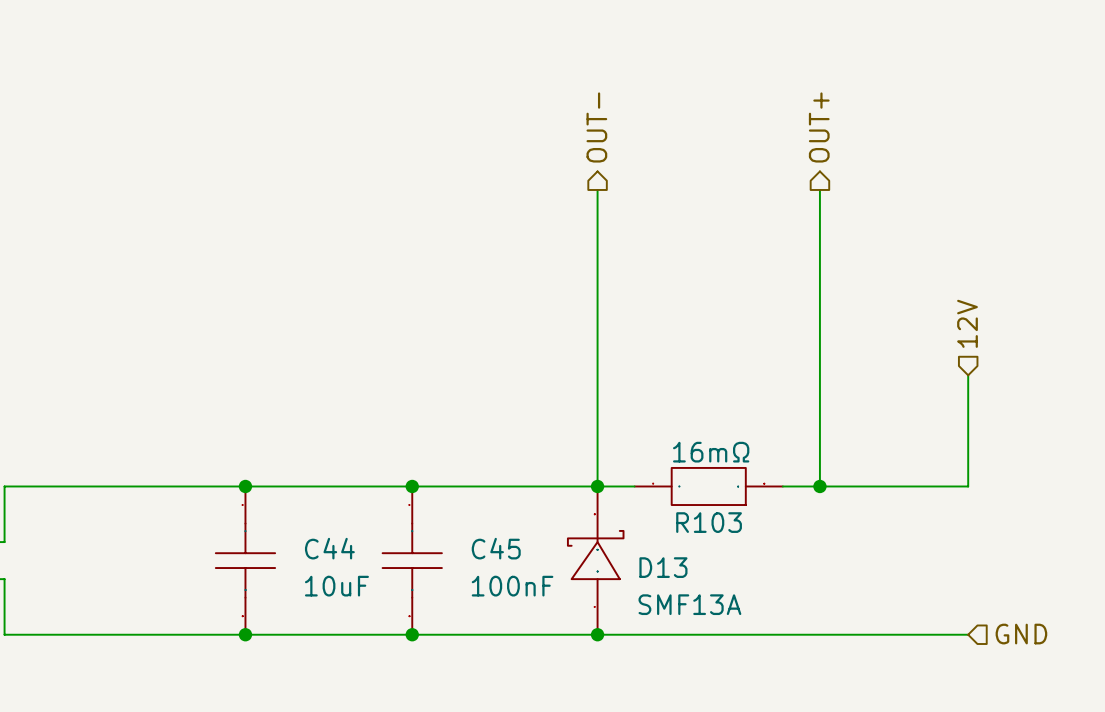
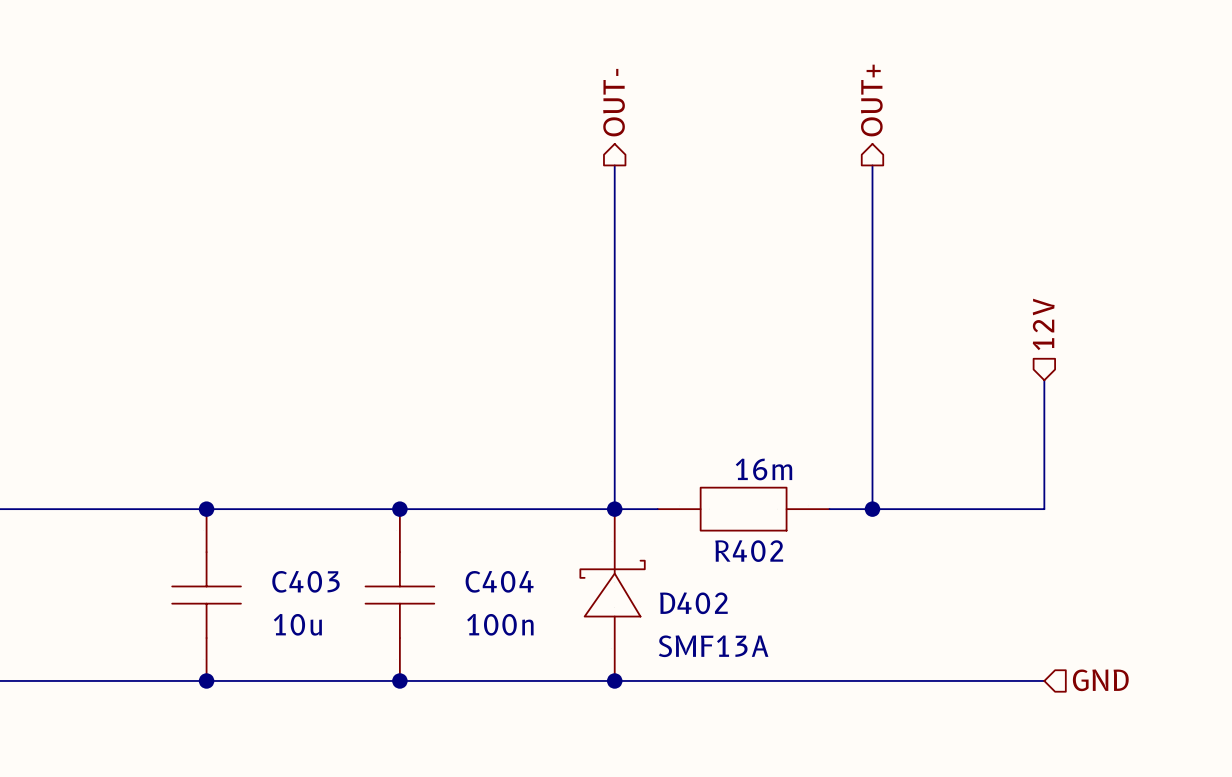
R103 value: 16mΩ (711, 452) -> 16m (763, 469)
R103 name: R103 (709, 522) -> R402 (749, 551)
C44 name: C44 (329, 548) -> C403 (305, 581)
C45 name: C45 (496, 548) -> C404 (499, 581)
D13 name: D13 (663, 567) -> D402 (693, 603)
C44 value: 10uF (336, 586) -> 10u (297, 624)
C45 value: 100nF (512, 586) -> 100n (500, 624)

